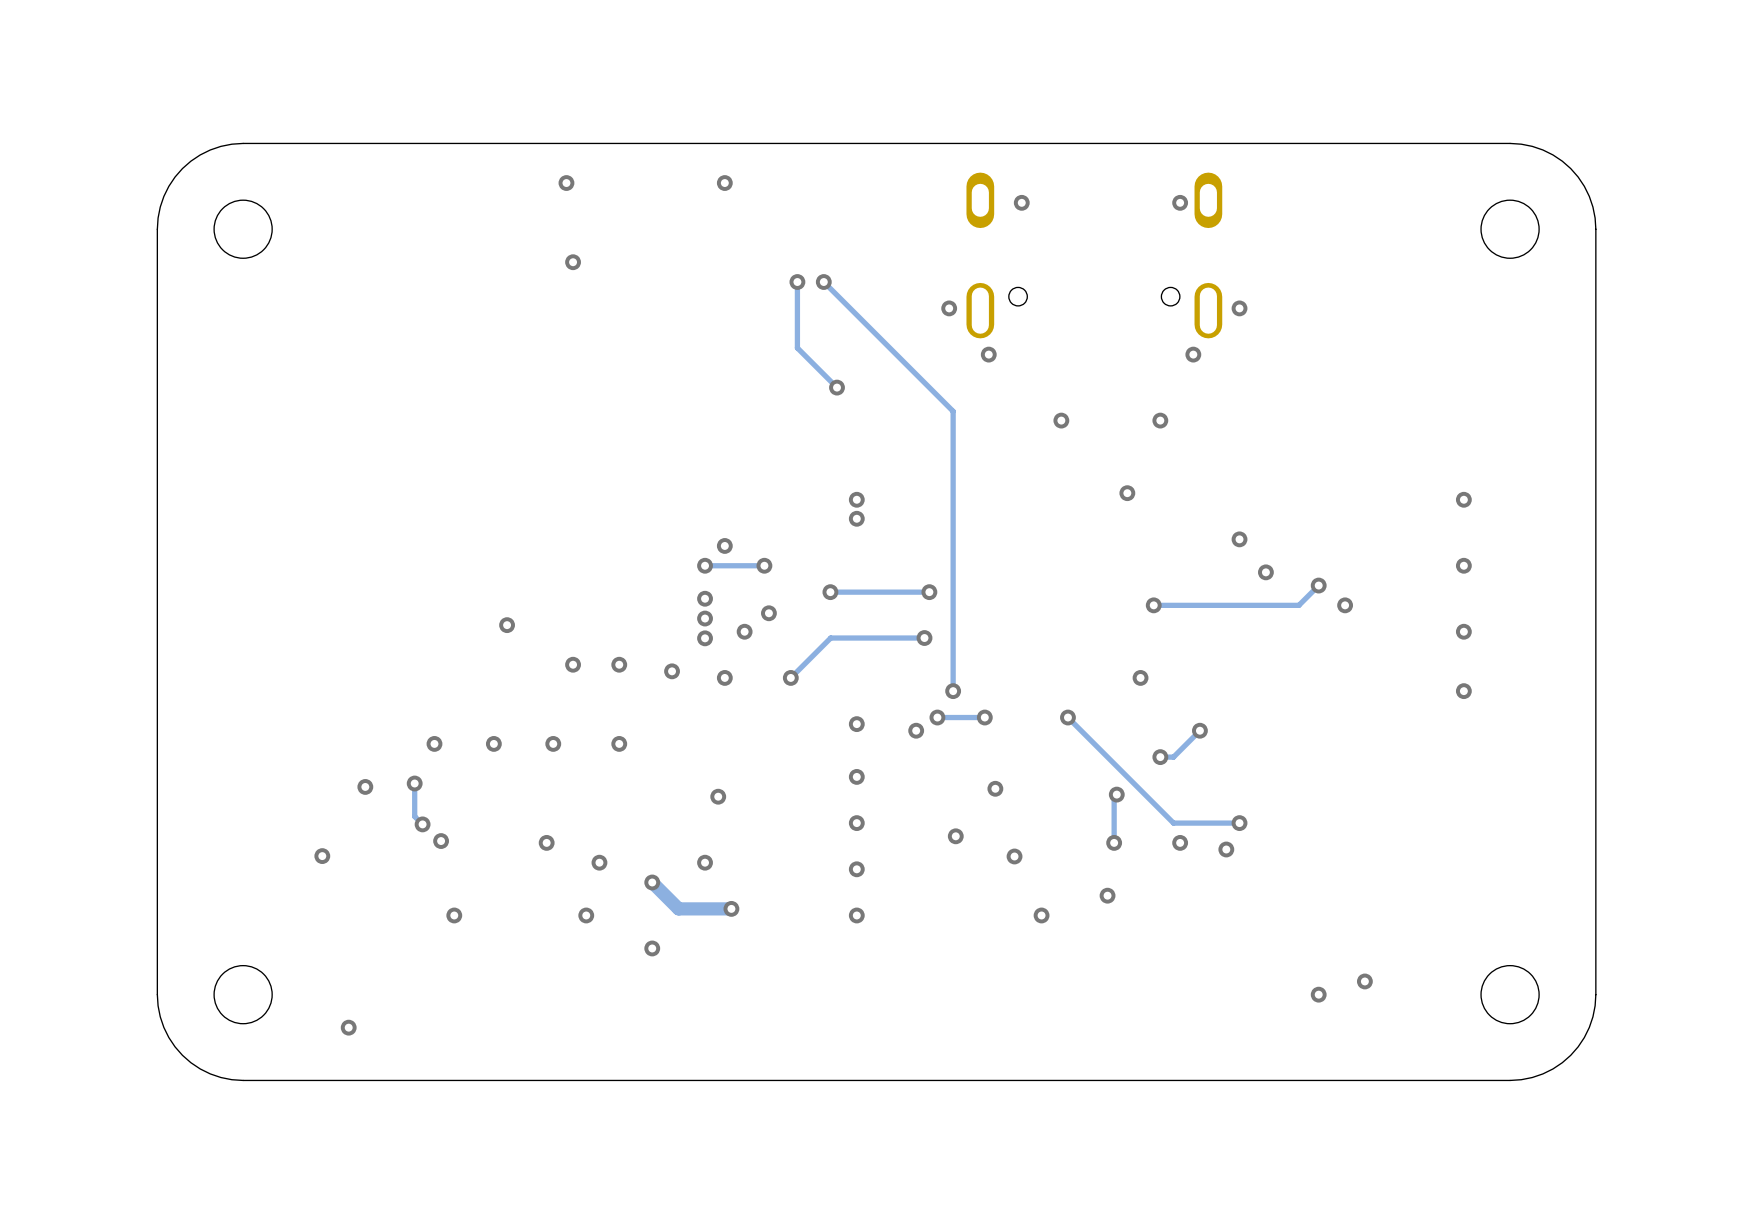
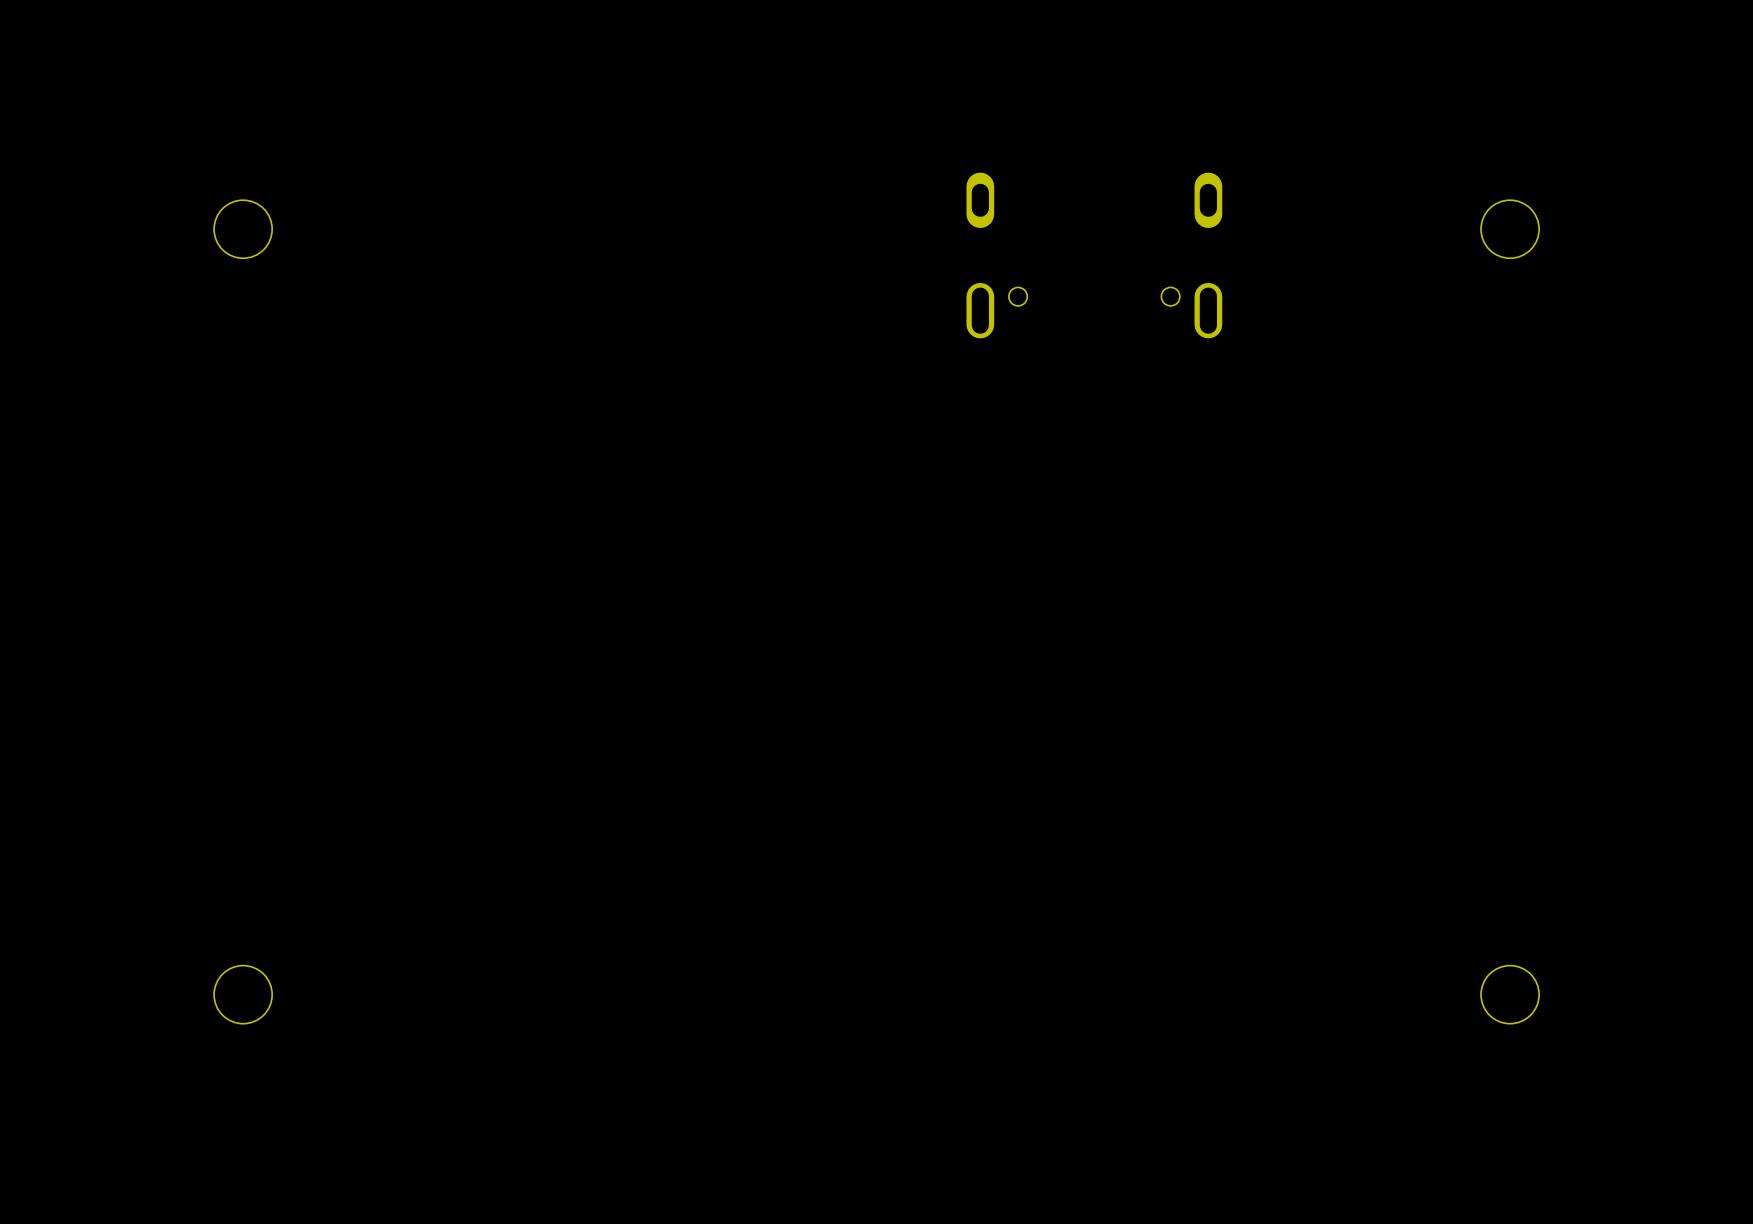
board edge: (1510, 143) (243, 143) (220, 146) (190, 161) (175, 177) (163, 196) (157, 229) (157, 994) (160, 1016) (175, 1046) (190, 1062) (210, 1073) (243, 1080) (1510, 1080) (1542, 1073) (1562, 1062) (1584, 1037) (1592, 1016) (1595, 994) (1595, 229) (1589, 196) (1570, 168) (1542, 149) (1510, 143) -> none
via: (566, 183) -> none
via: (724, 183) -> none
via: (1021, 202) -> none
via: (1180, 202) -> none
via: (573, 262) -> none
track: (797, 282) (797, 348) (837, 387) -> none
via: (797, 282) -> none
track: (823, 282) (953, 411) (953, 691) -> none
via: (823, 282) -> none
via: (949, 308) -> none
via: (1239, 308) -> none
via: (988, 354) -> none
via: (1193, 354) -> none
via: (837, 387) -> none
via: (1061, 420) -> none
via: (1160, 420) -> none
via: (1127, 493) -> none
via: (856, 499) -> none
via: (1463, 499) -> none
via: (856, 518) -> none
via: (1239, 539) -> none
via: (724, 545) -> none
via: (705, 565) -> none
track: (764, 565) (705, 565) -> none
via: (764, 565) -> none
via: (1463, 565) -> none
via: (1265, 572) -> none
track: (1318, 585) (1298, 605) (1153, 605) -> none
via: (1318, 585) -> none
via: (830, 592) -> none
track: (929, 592) (830, 592) -> none
via: (929, 592) -> none
via: (705, 598) -> none
via: (1153, 605) -> none
via: (1345, 605) -> none
via: (768, 613) -> none
via: (705, 618) -> none
via: (507, 625) -> none
via: (744, 631) -> none
via: (1463, 631) -> none
via: (705, 638) -> none
track: (924, 638) (830, 638) (790, 677) -> none
via: (924, 638) -> none
via: (573, 664) -> none
via: (619, 664) -> none
via: (672, 671) -> none
via: (724, 677) -> none
via: (790, 677) -> none
via: (1140, 677) -> none
via: (953, 691) -> none
via: (1463, 691) -> none
via: (937, 717) -> none
track: (984, 717) (937, 717) -> none
via: (984, 717) -> none
track: (1067, 717) (1173, 823) (1239, 823) -> none
via: (1067, 717) -> none
via: (856, 724) -> none
via: (916, 730) -> none
track: (1199, 730) (1173, 757) (1160, 757) -> none
via: (1199, 730) -> none
via: (434, 743) -> none
via: (493, 743) -> none
via: (553, 743) -> none
via: (619, 743) -> none
via: (1160, 757) -> none
via: (856, 776) -> none
track: (414, 783) (414, 816) (422, 824) -> none
via: (414, 783) -> none
via: (365, 786) -> none
via: (995, 788) -> none
track: (1116, 794) (1114, 797) (1114, 842) -> none
via: (1116, 794) -> none
via: (718, 796) -> none
via: (856, 823) -> none
via: (1239, 823) -> none
via: (422, 824) -> none
via: (955, 836) -> none
via: (441, 841) -> none
via: (546, 842) -> none
via: (1114, 842) -> none
via: (1180, 842) -> none
via: (1226, 849) -> none
via: (322, 856) -> none
via: (1014, 856) -> none
via: (599, 862) -> none
via: (705, 862) -> none
via: (856, 869) -> none
track: (652, 882) (678, 908) (731, 908) -> none
via: (652, 882) -> none
via: (1107, 895) -> none
via: (731, 908) -> none
via: (454, 915) -> none
via: (586, 915) -> none
via: (856, 915) -> none
via: (1041, 915) -> none
via: (652, 948) -> none
via: (1364, 981) -> none
via: (1318, 994) -> none
via: (348, 1027) -> none

